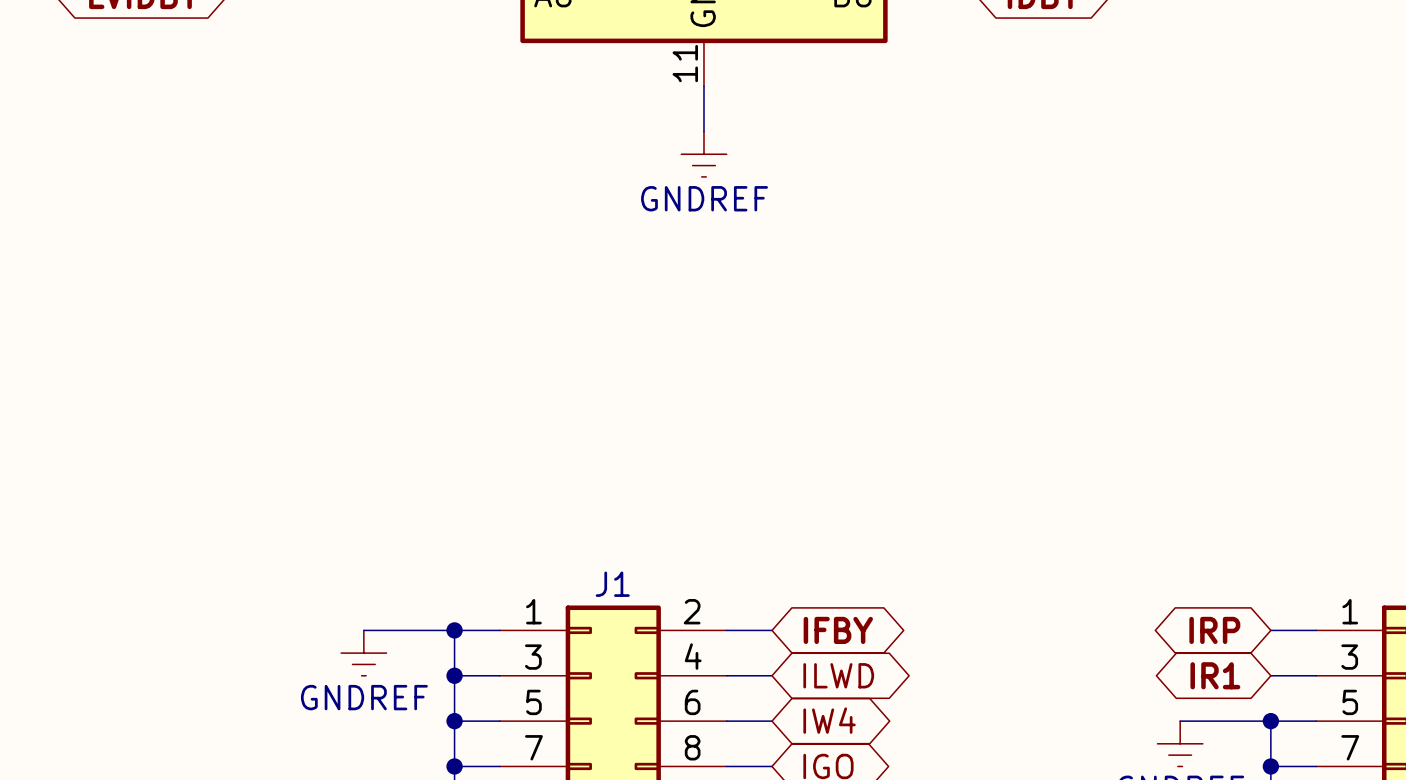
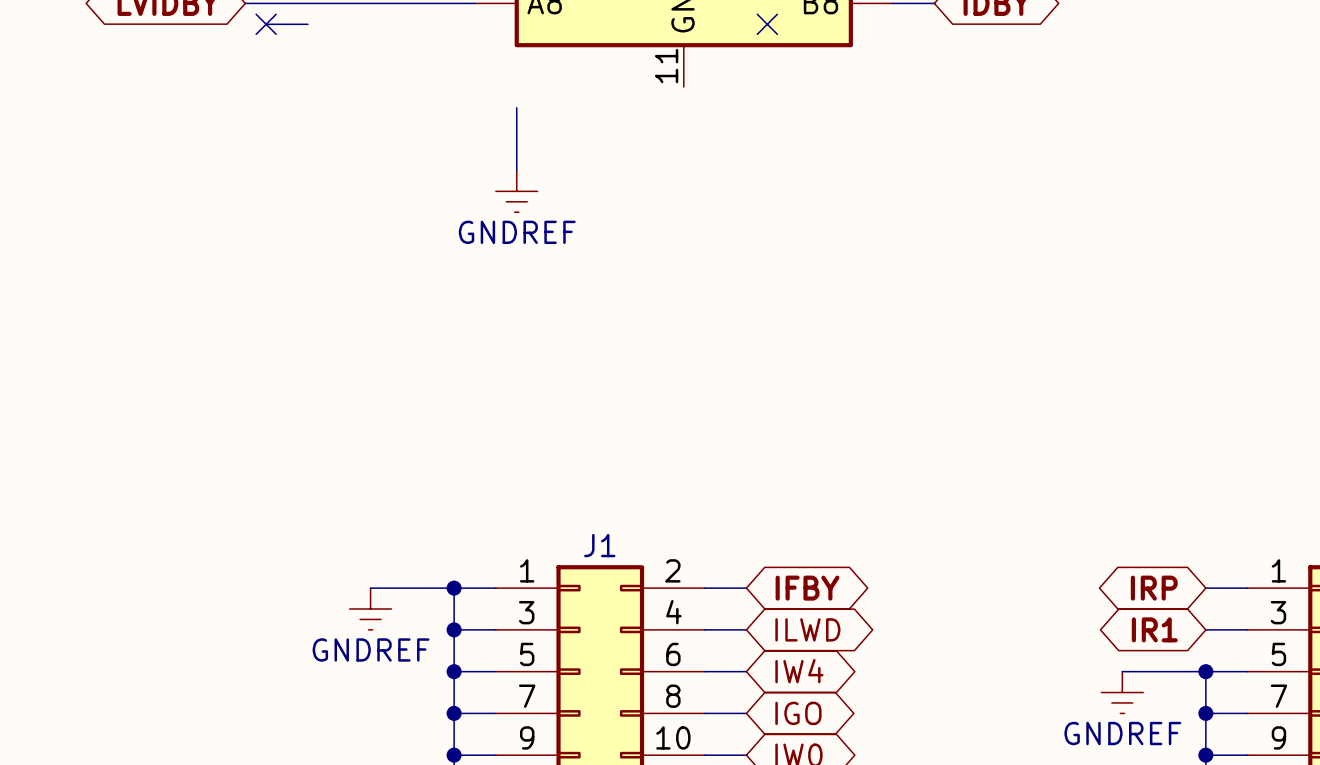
wire: none -> (266, 24) (307, 24)
no-connect mark: none -> (266, 24)
no-connect mark: none -> (767, 24)
wire: (703, 86) (703, 131) -> none
wire: none -> (516, 107) (516, 170)
power symbol position: GNDREF (703, 154) -> GNDREF (516, 191)

